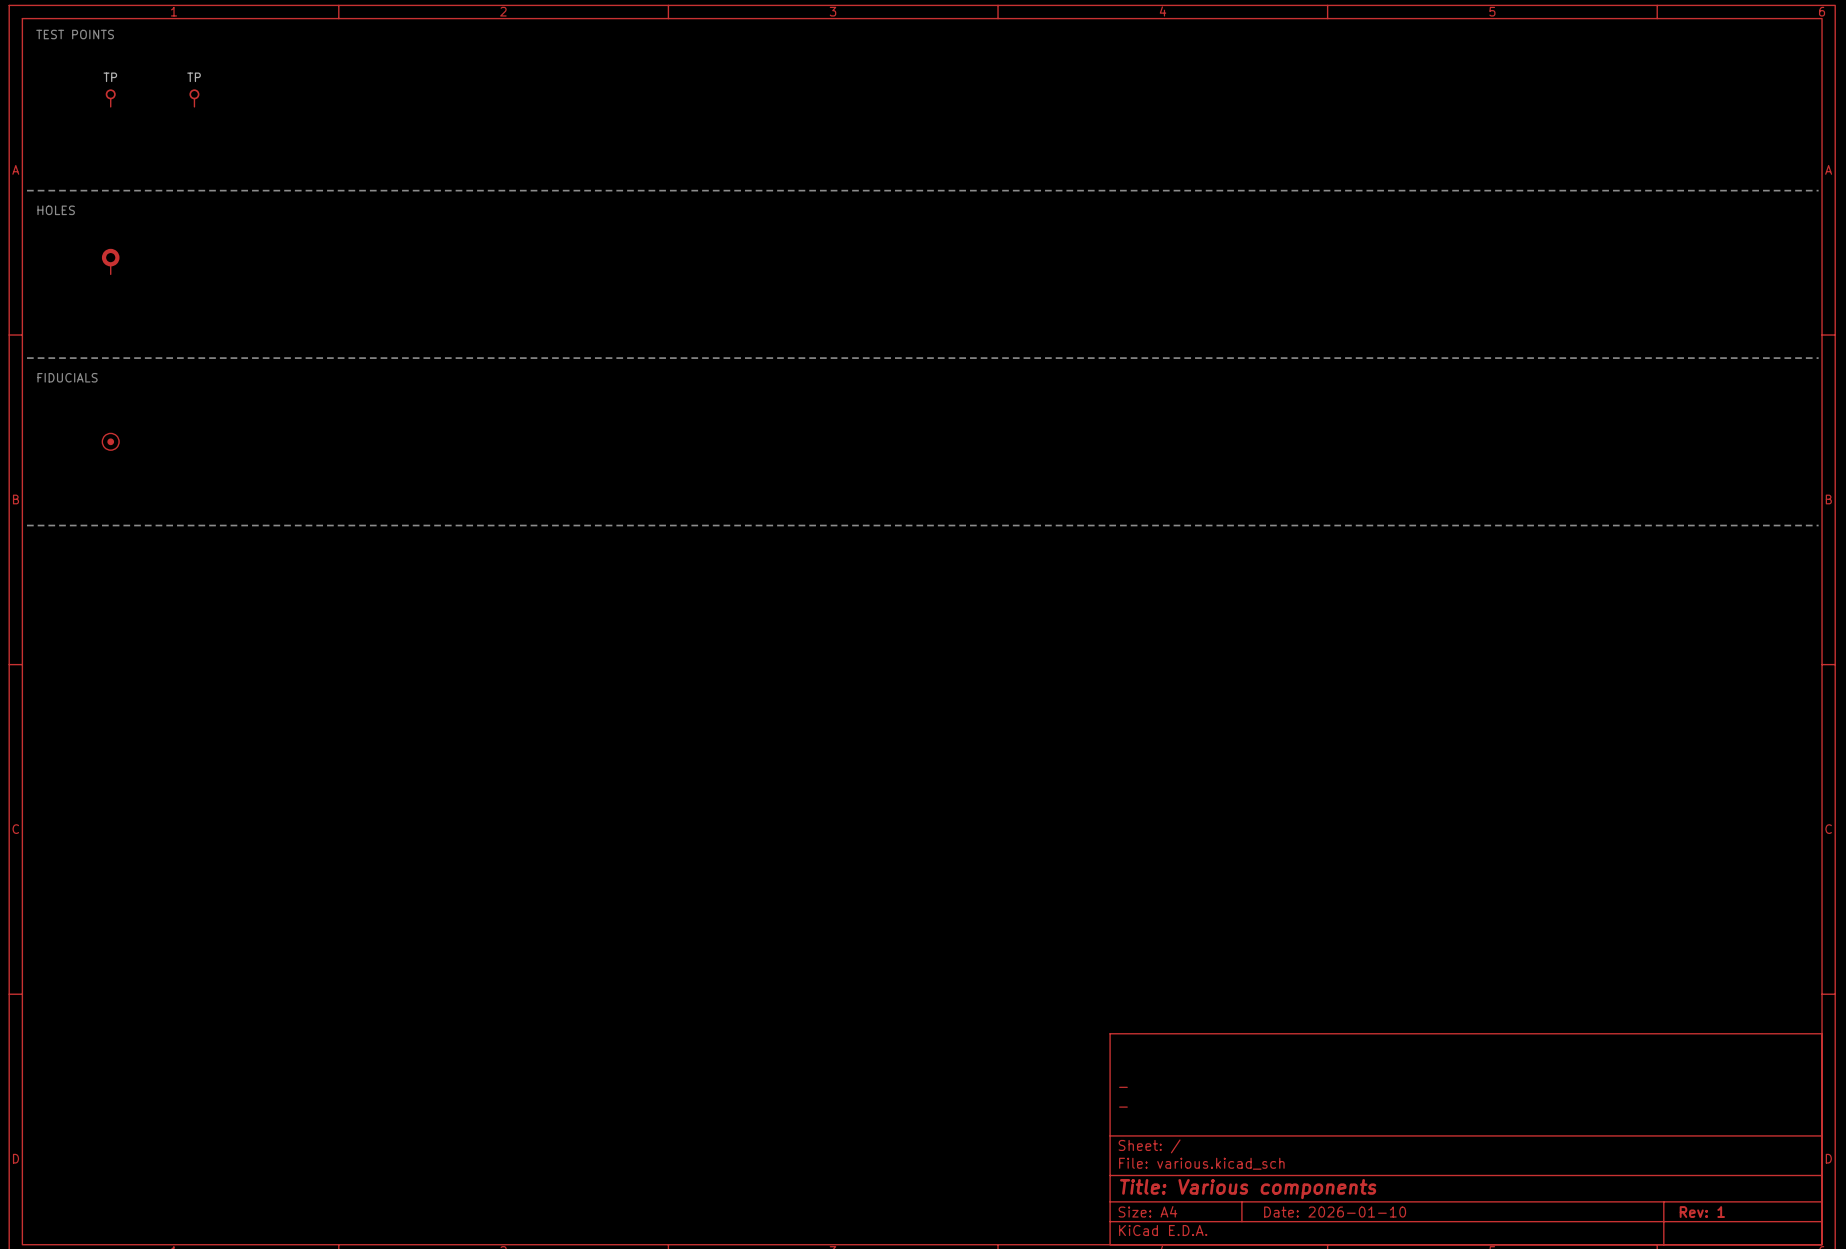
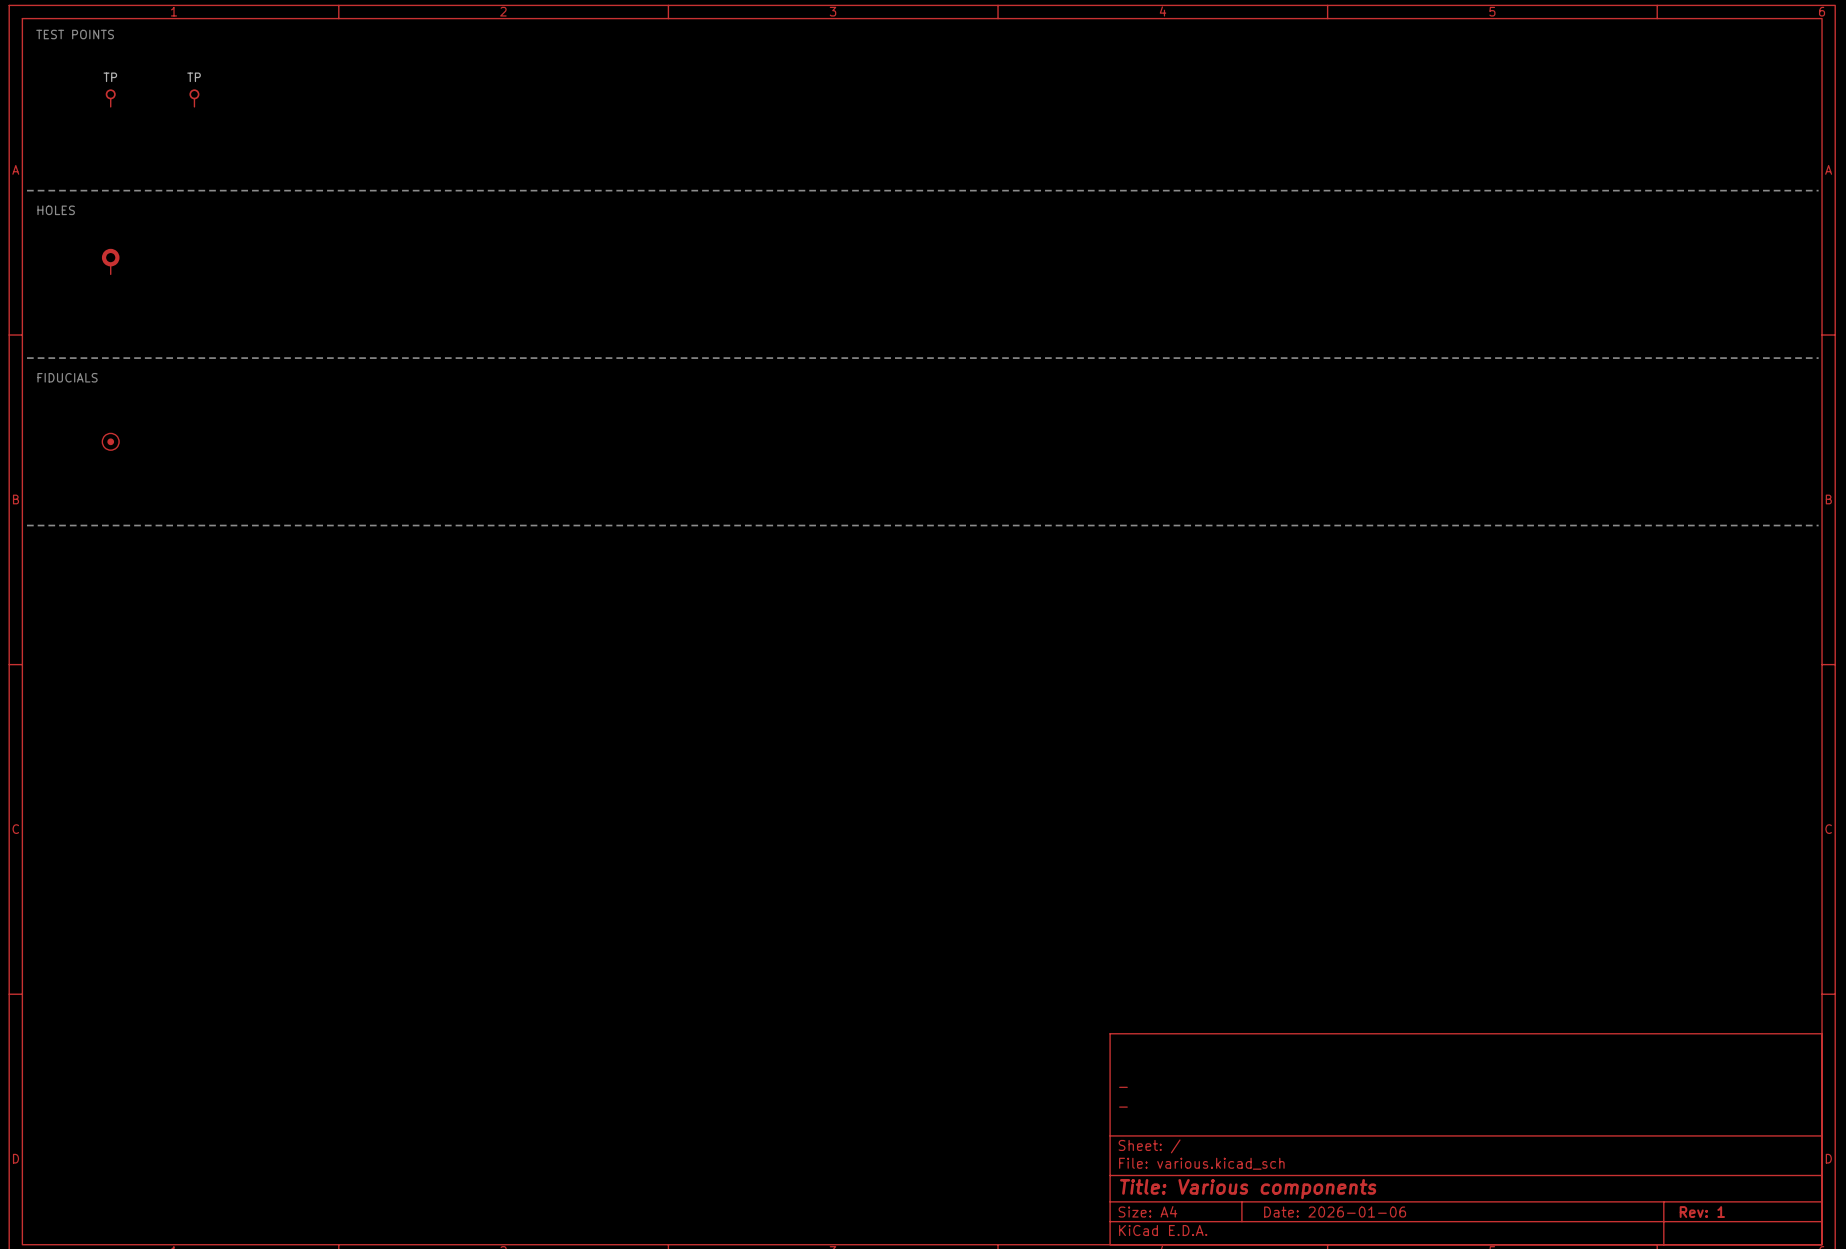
title block: Date: 2026-01-10 (1335, 1212) -> Date: 2026-01-06 (1335, 1212)

